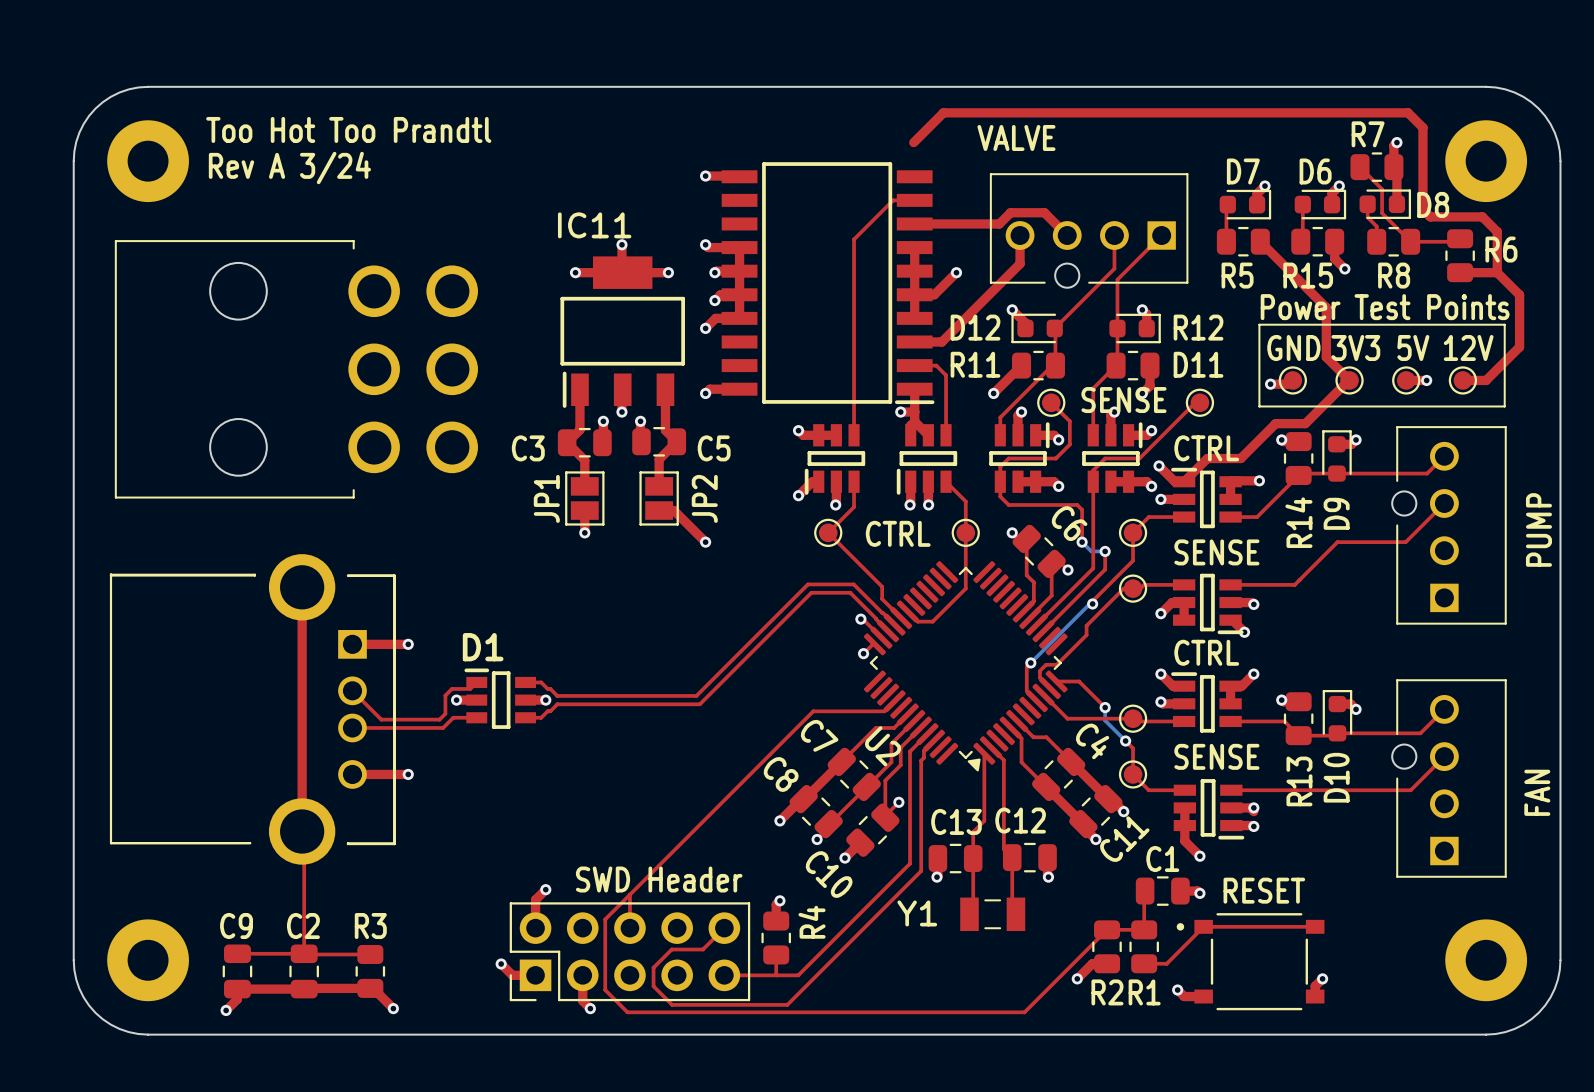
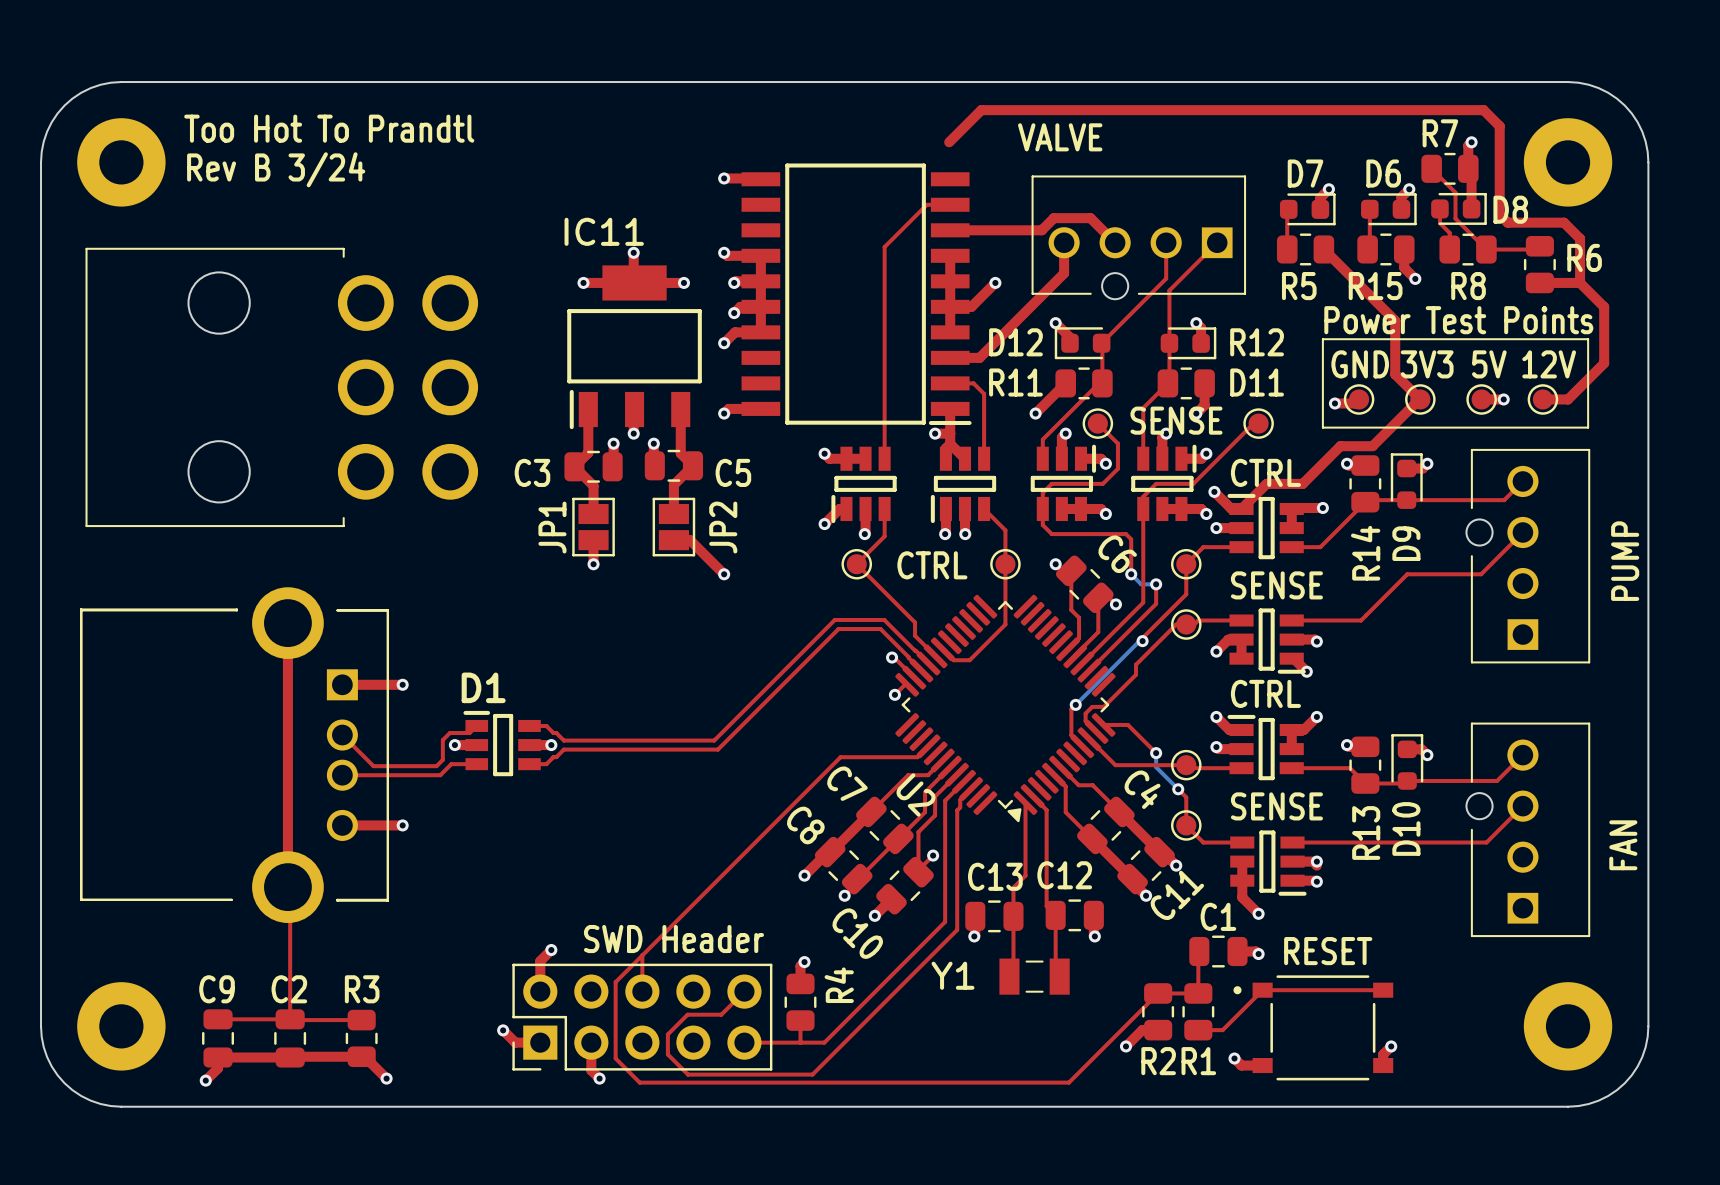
text: Too Hot Too Prandtl (348, 129) -> Too Hot To Prandtl (329, 128)
text: Rev A 3/24 (289, 167) -> Rev B 3/24 (276, 169)

